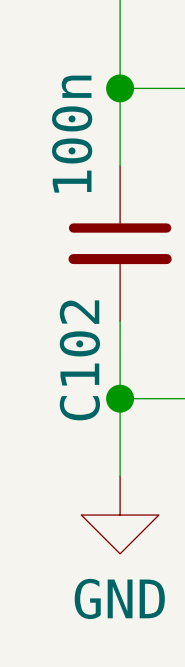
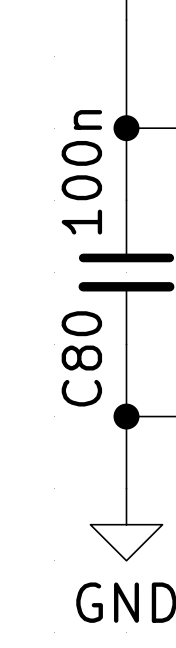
C102 name: C102 (79, 360) -> C80 (81, 358)

